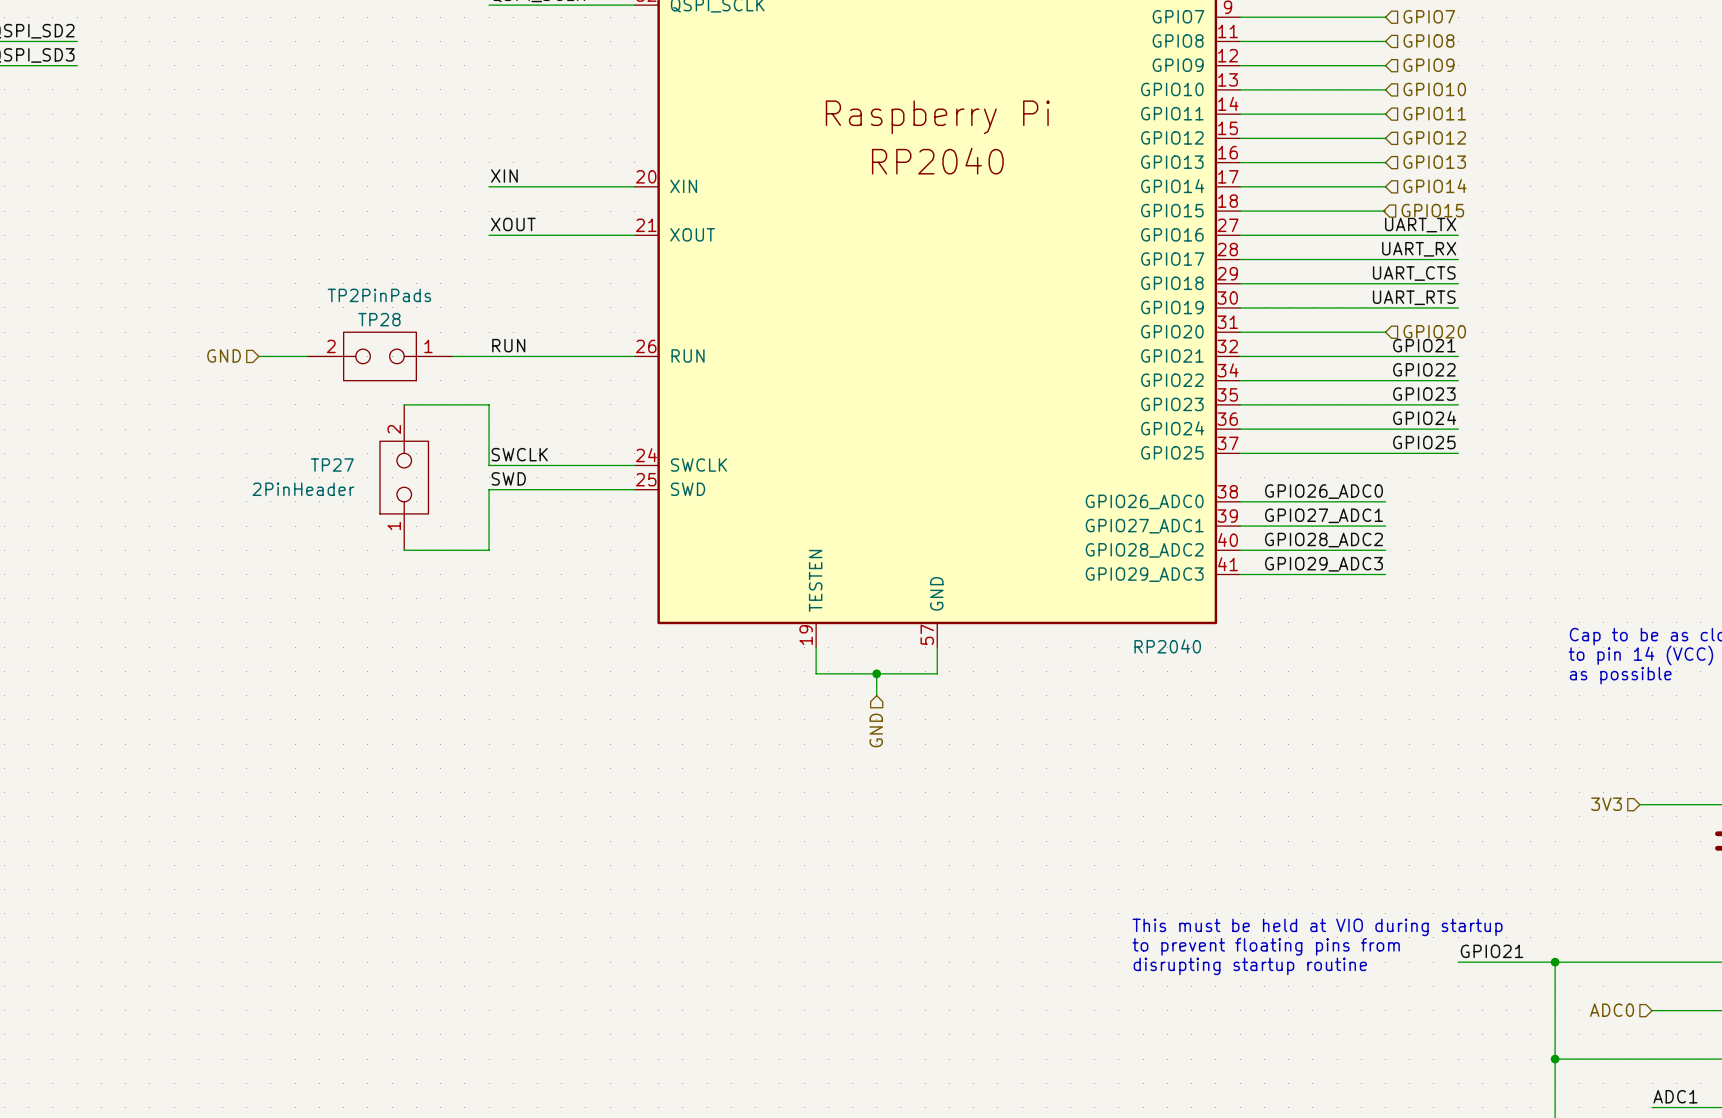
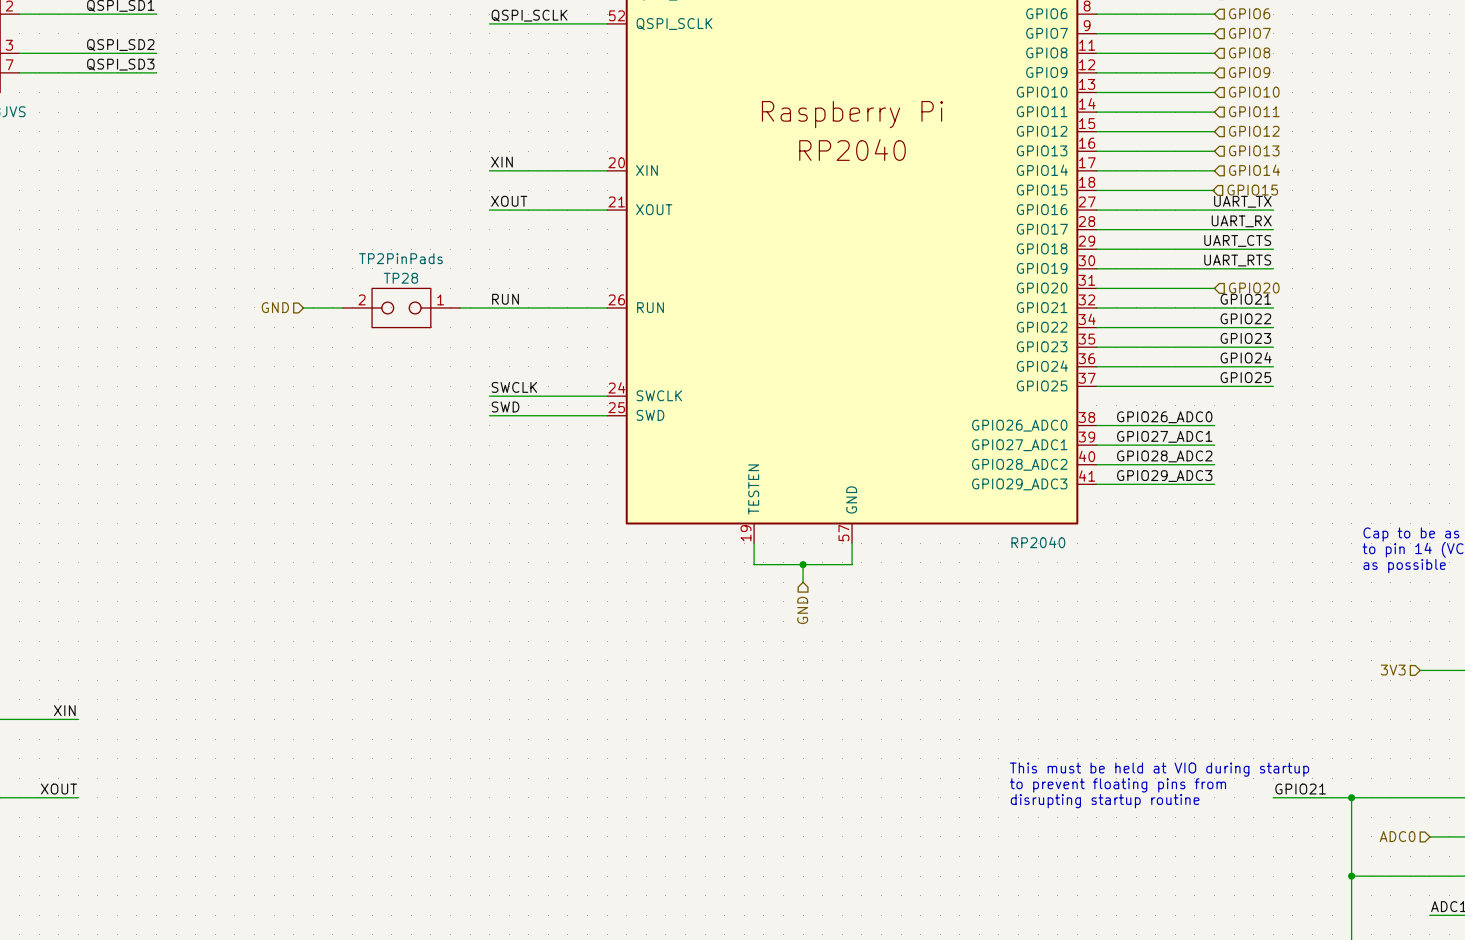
wire: (404, 404) (489, 404) (489, 465) -> none
TP27: 2PinHeader (404, 477) -> none
wire: (489, 489) (489, 550) (404, 550) -> none

